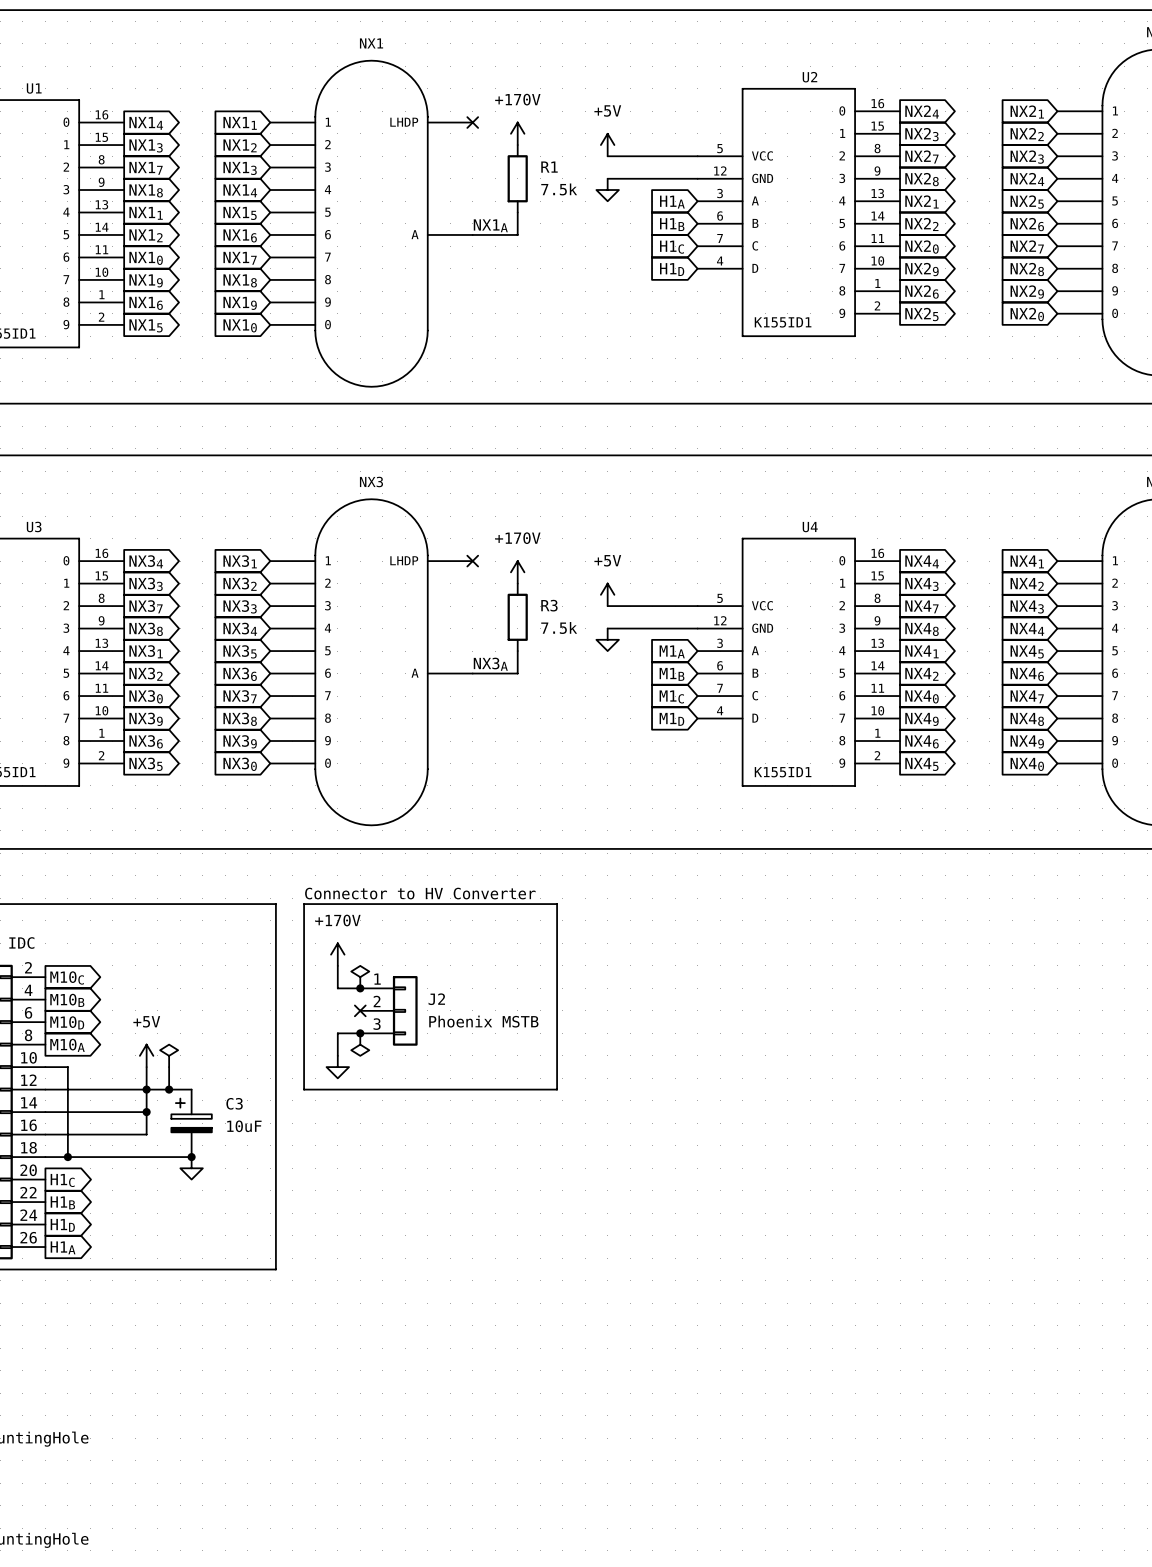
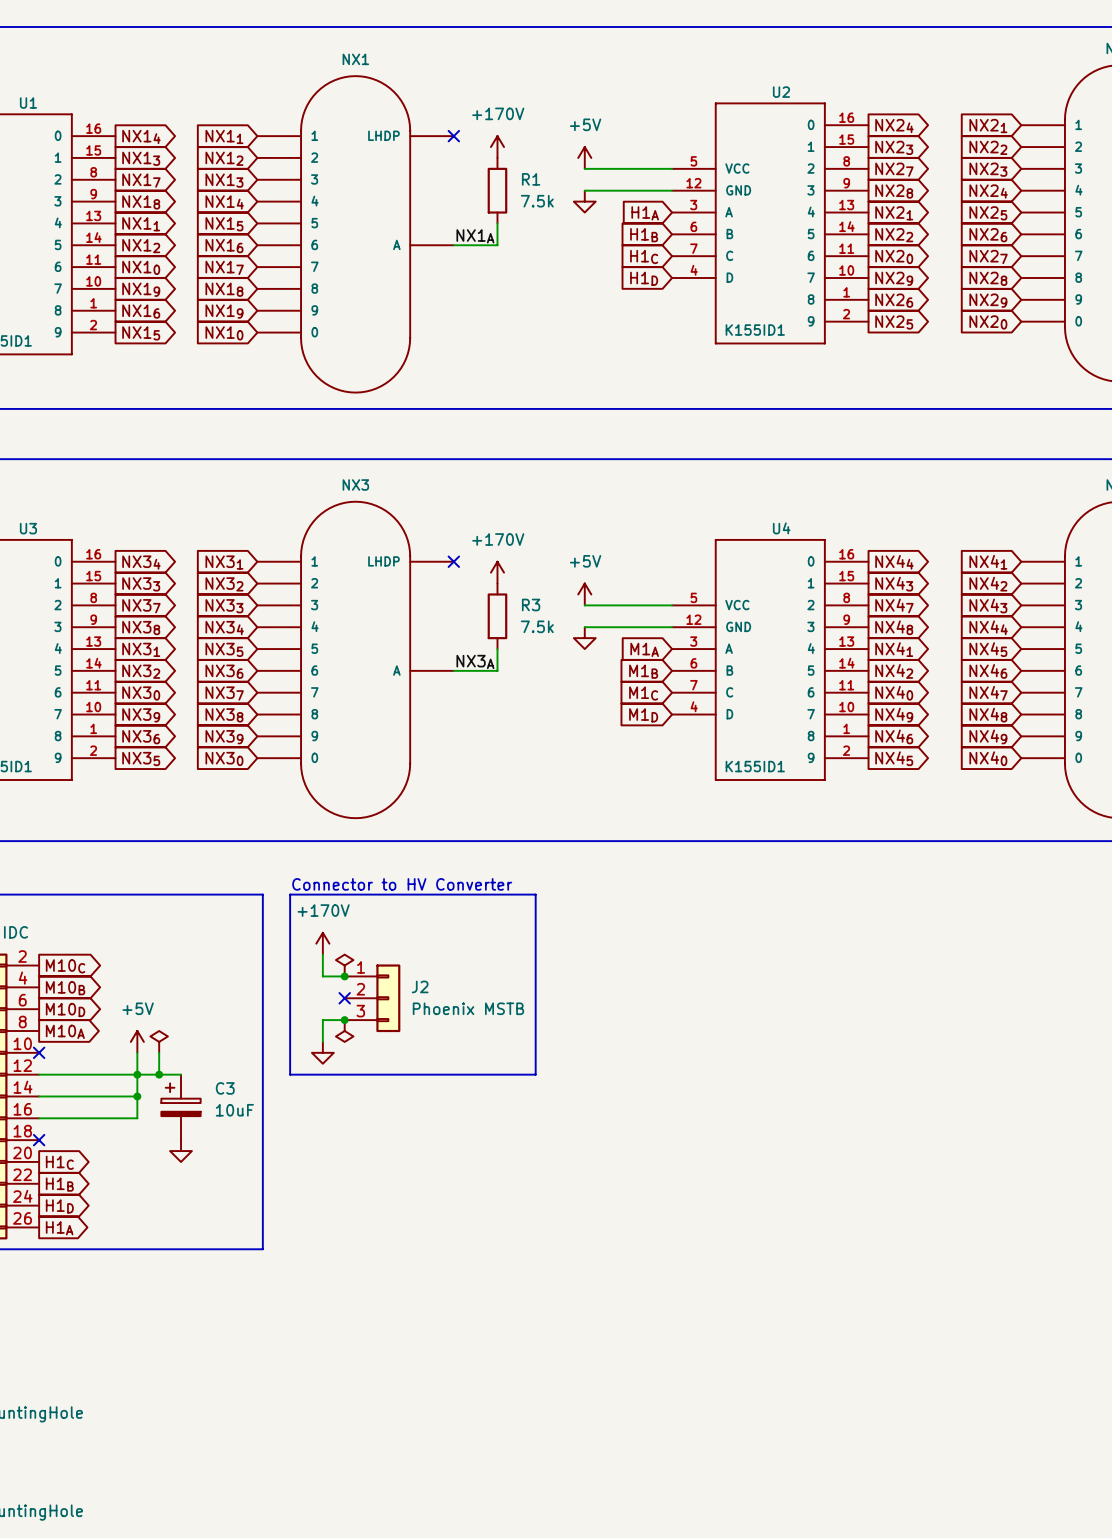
wire: (45, 1067) (67, 1067) (67, 1157) -> none
no-connect mark: none -> (39, 1052)
wire: (45, 1157) (191, 1157) -> none
no-connect mark: none -> (39, 1140)
junction: (67, 1157) -> none
junction: (191, 1157) -> none

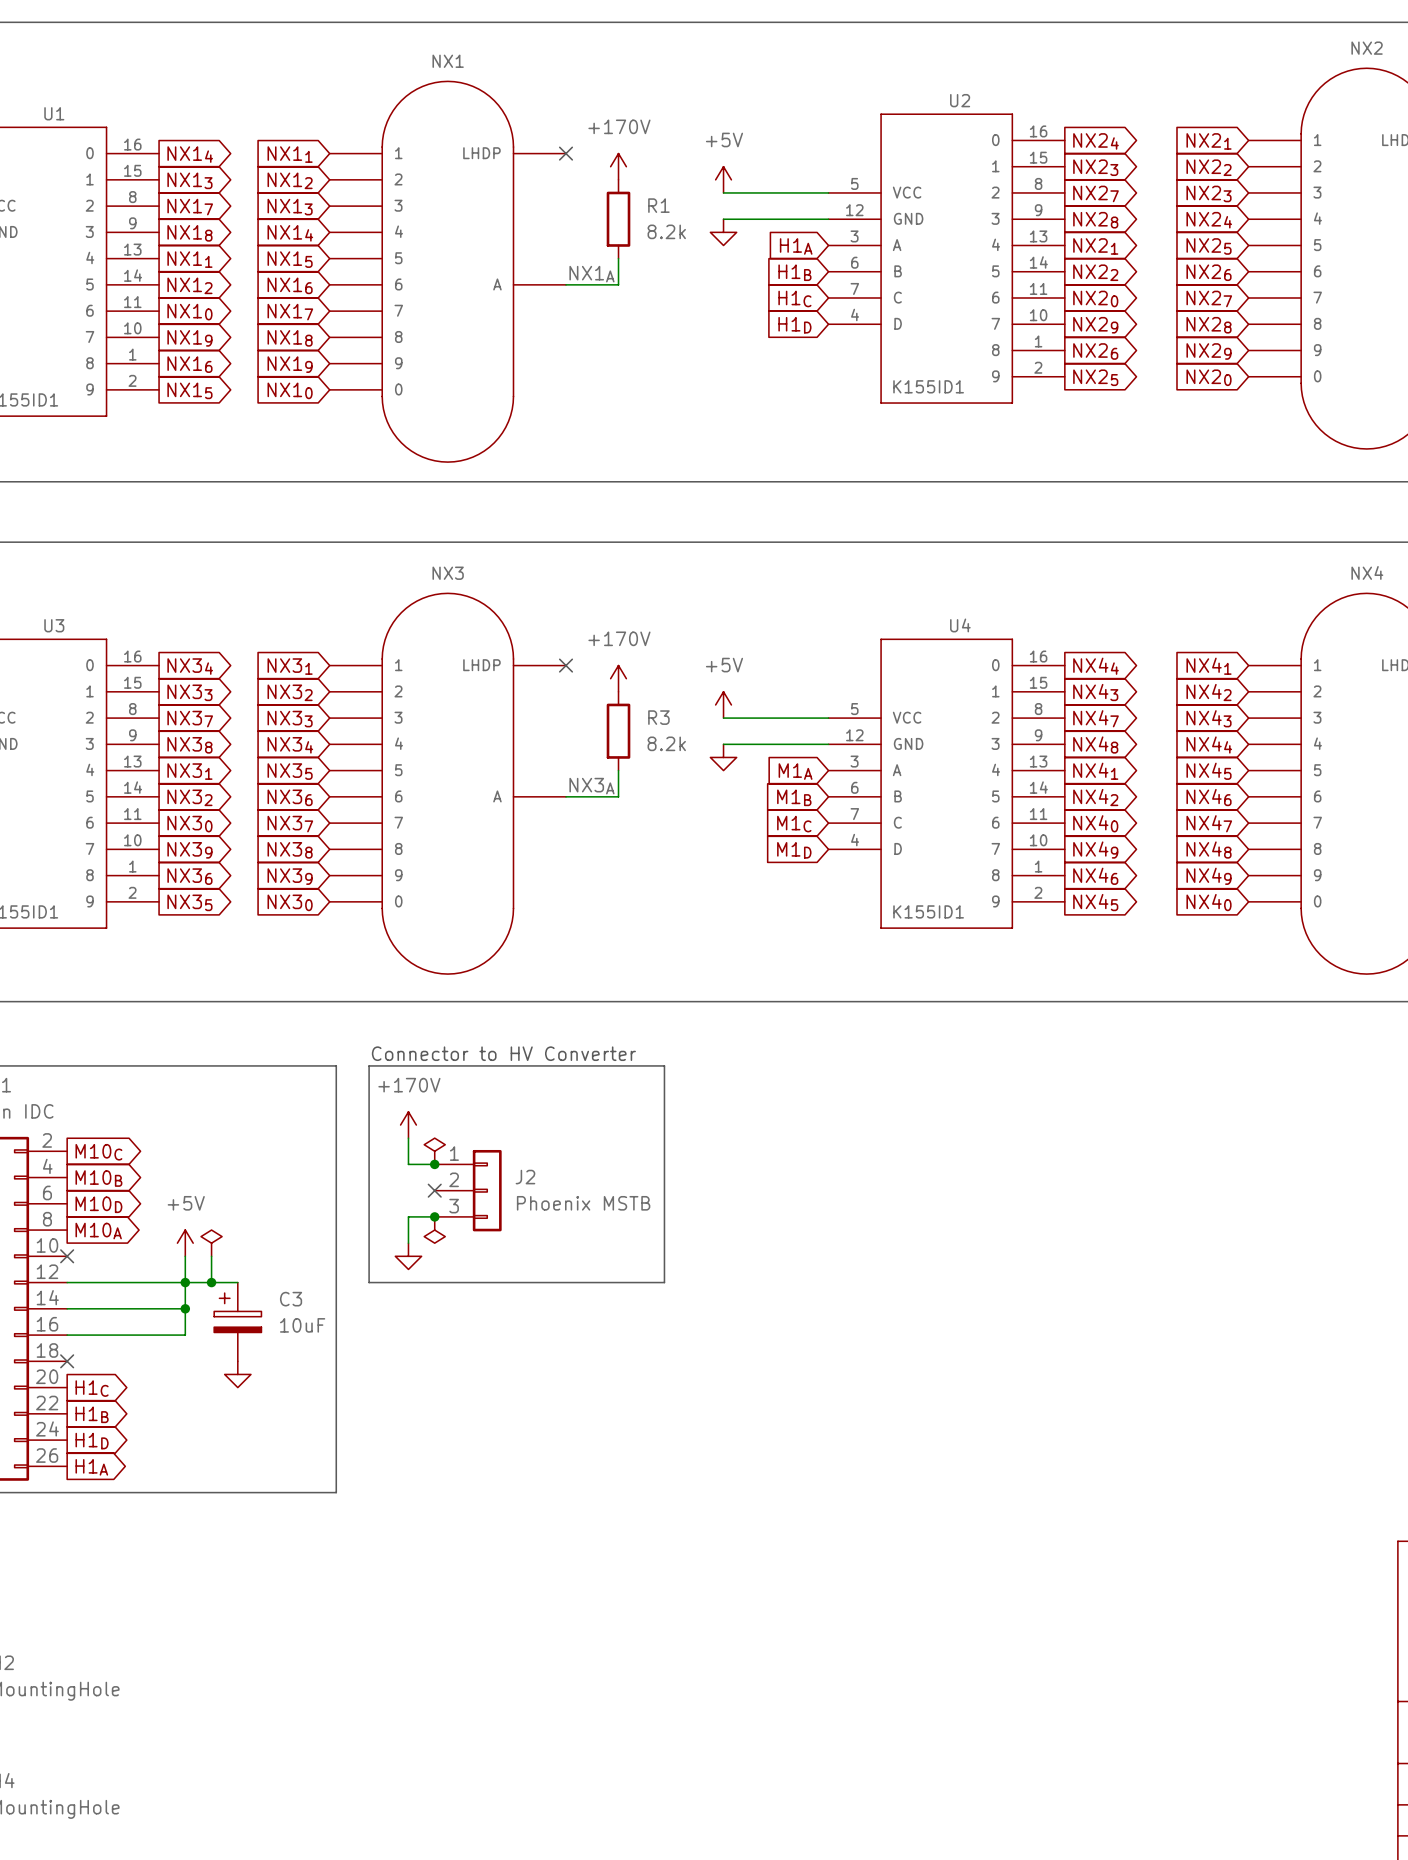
R1 value: 7.5k (537, 201) -> 8.2k (666, 231)
R3 value: 7.5k (537, 626) -> 8.2k (666, 743)

